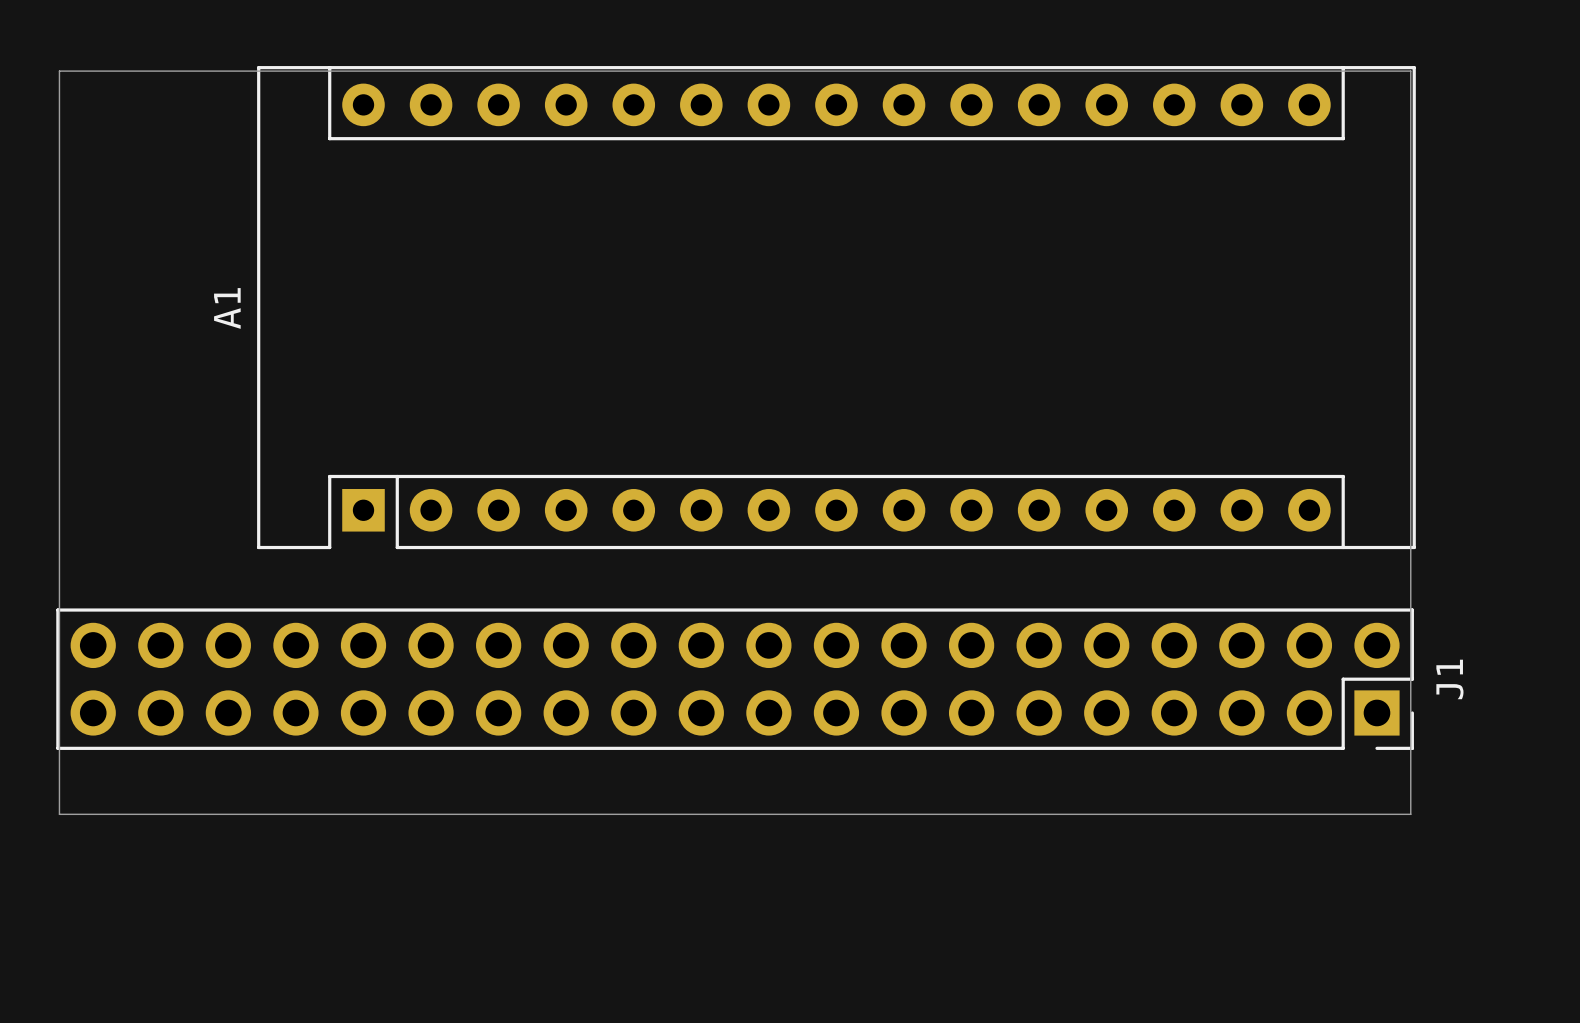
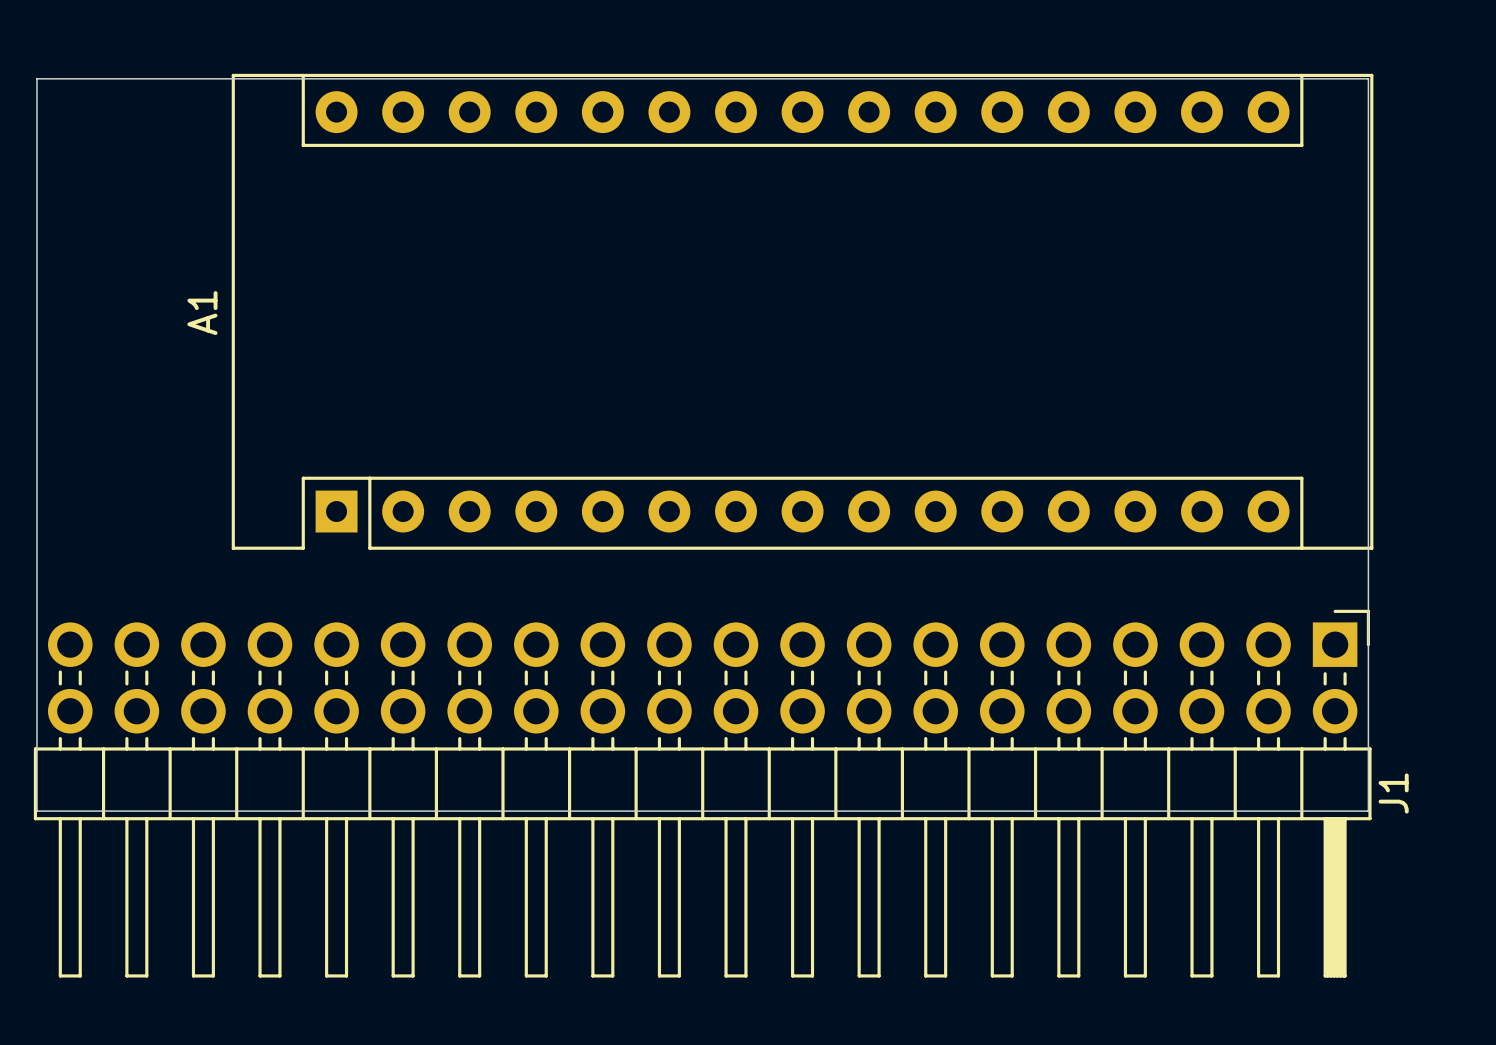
J1 footprint: [56, 608, 1414, 750] -> [33, 609, 1372, 978]

